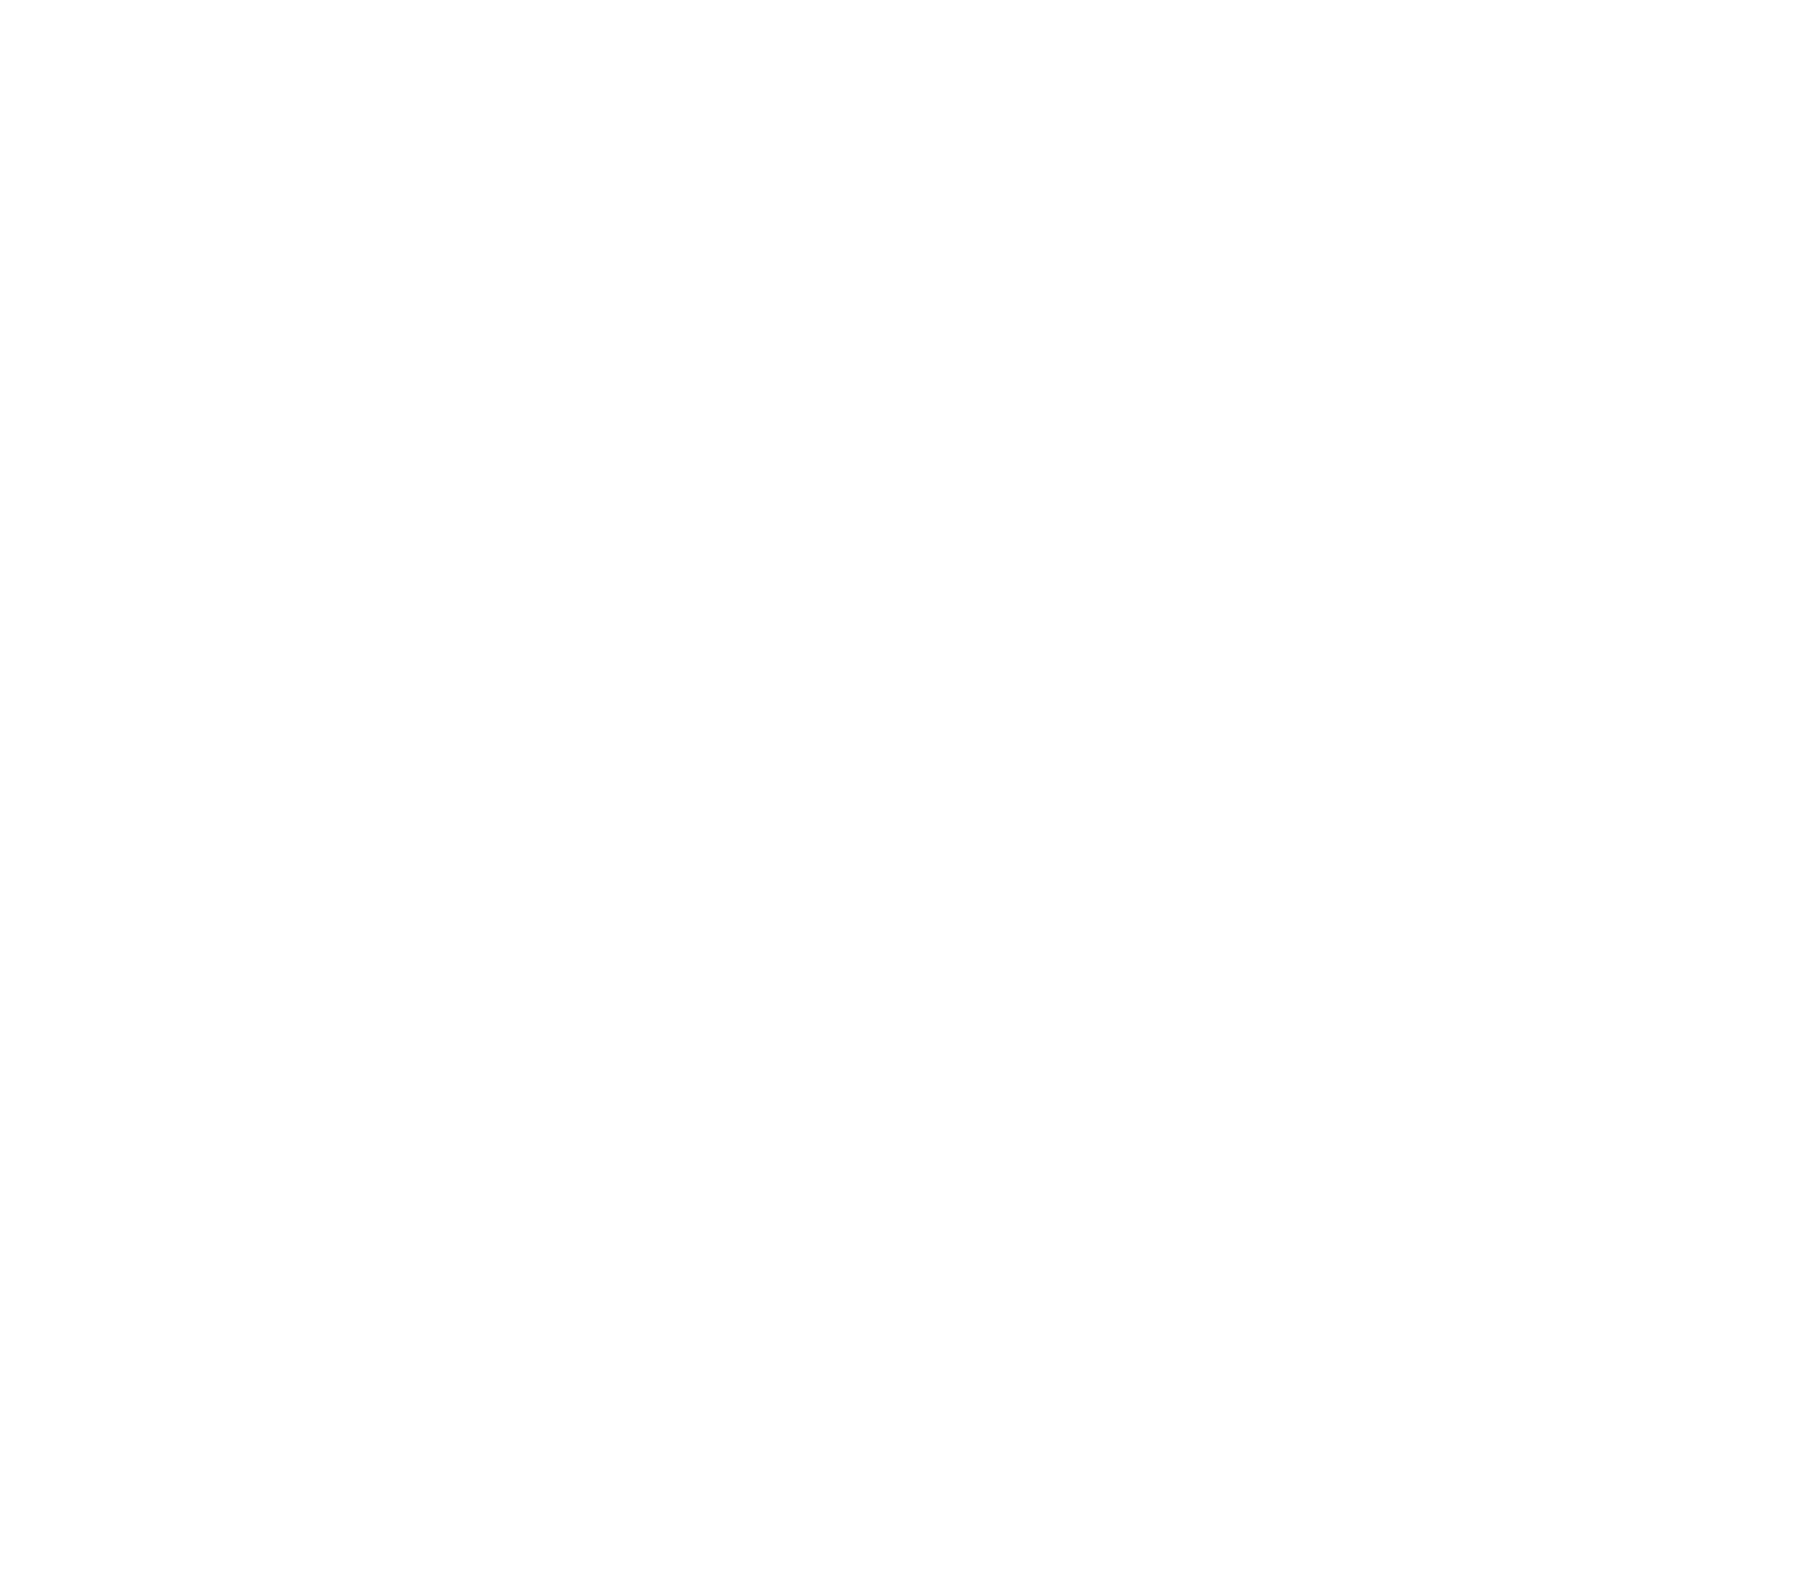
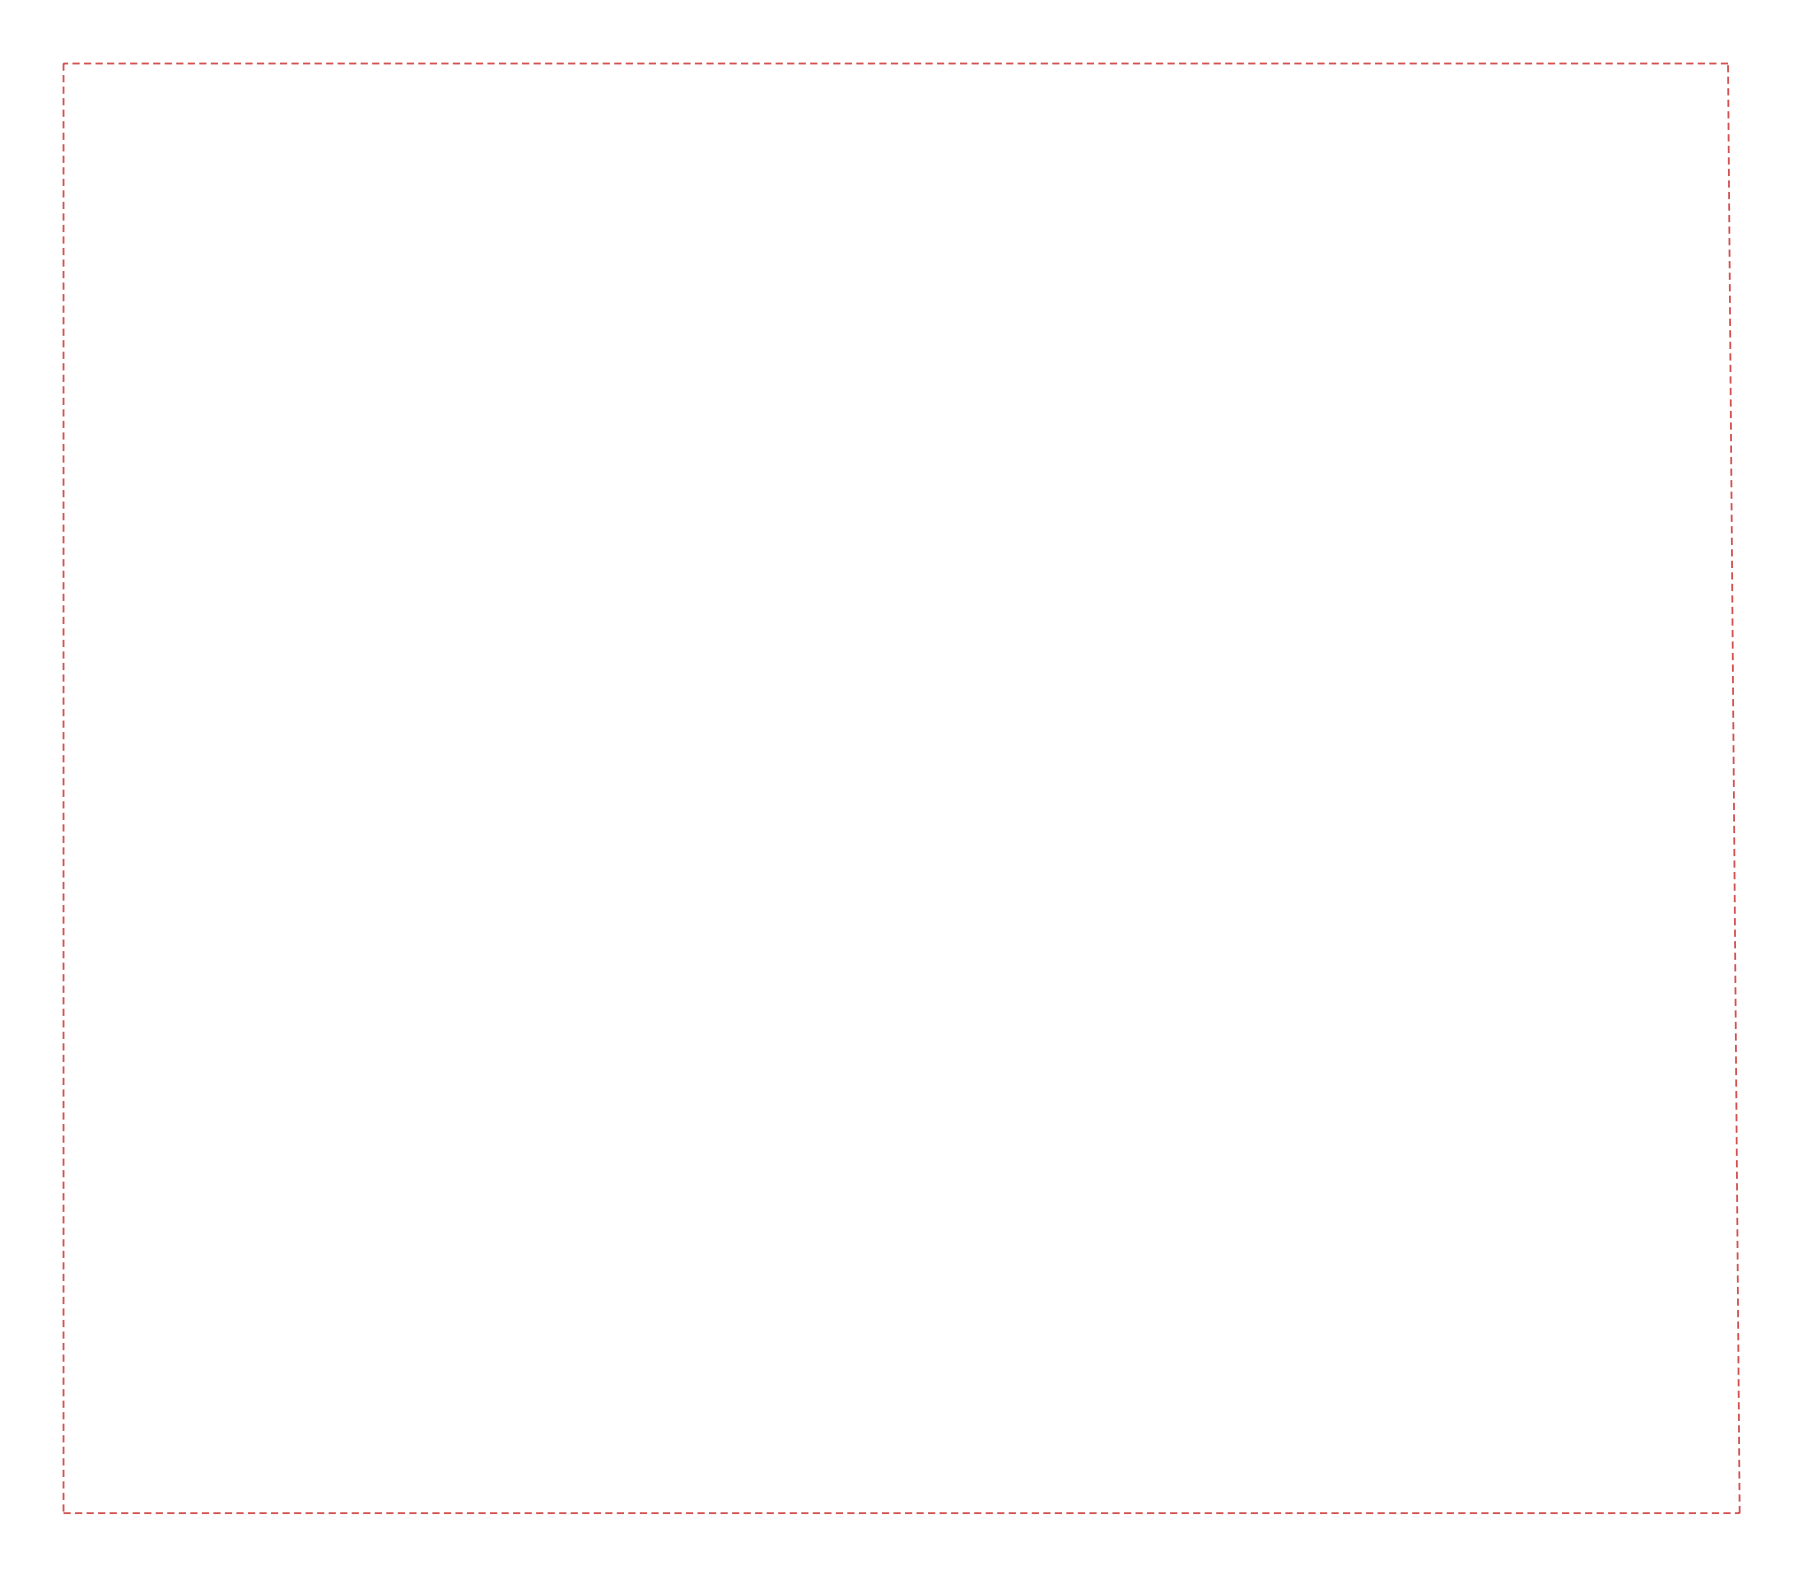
zone outline: none -> (63, 63) (63, 1513) (1739, 1513) (1728, 63) (63, 63)

